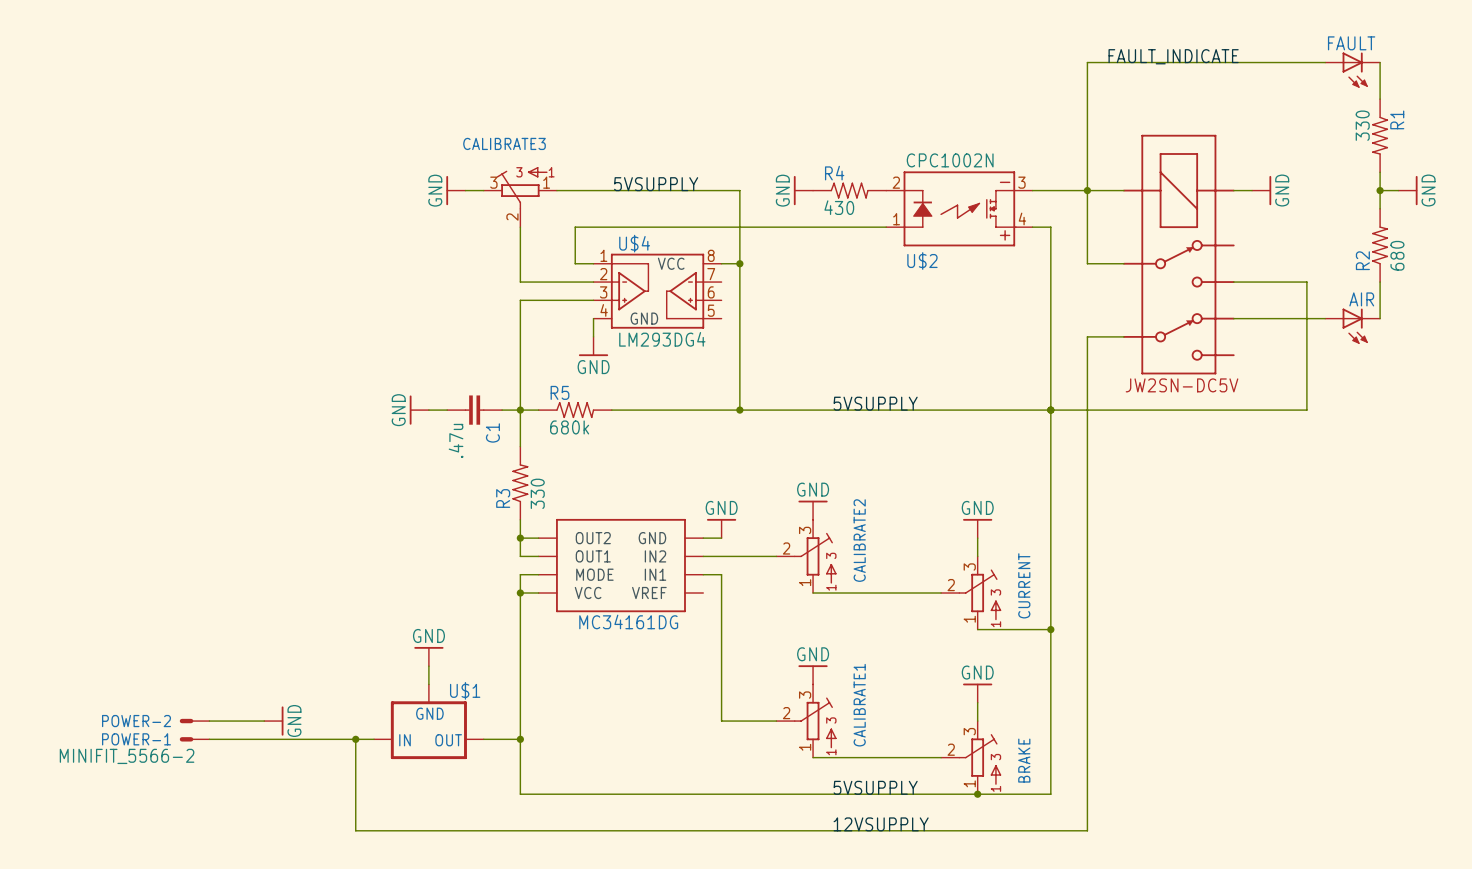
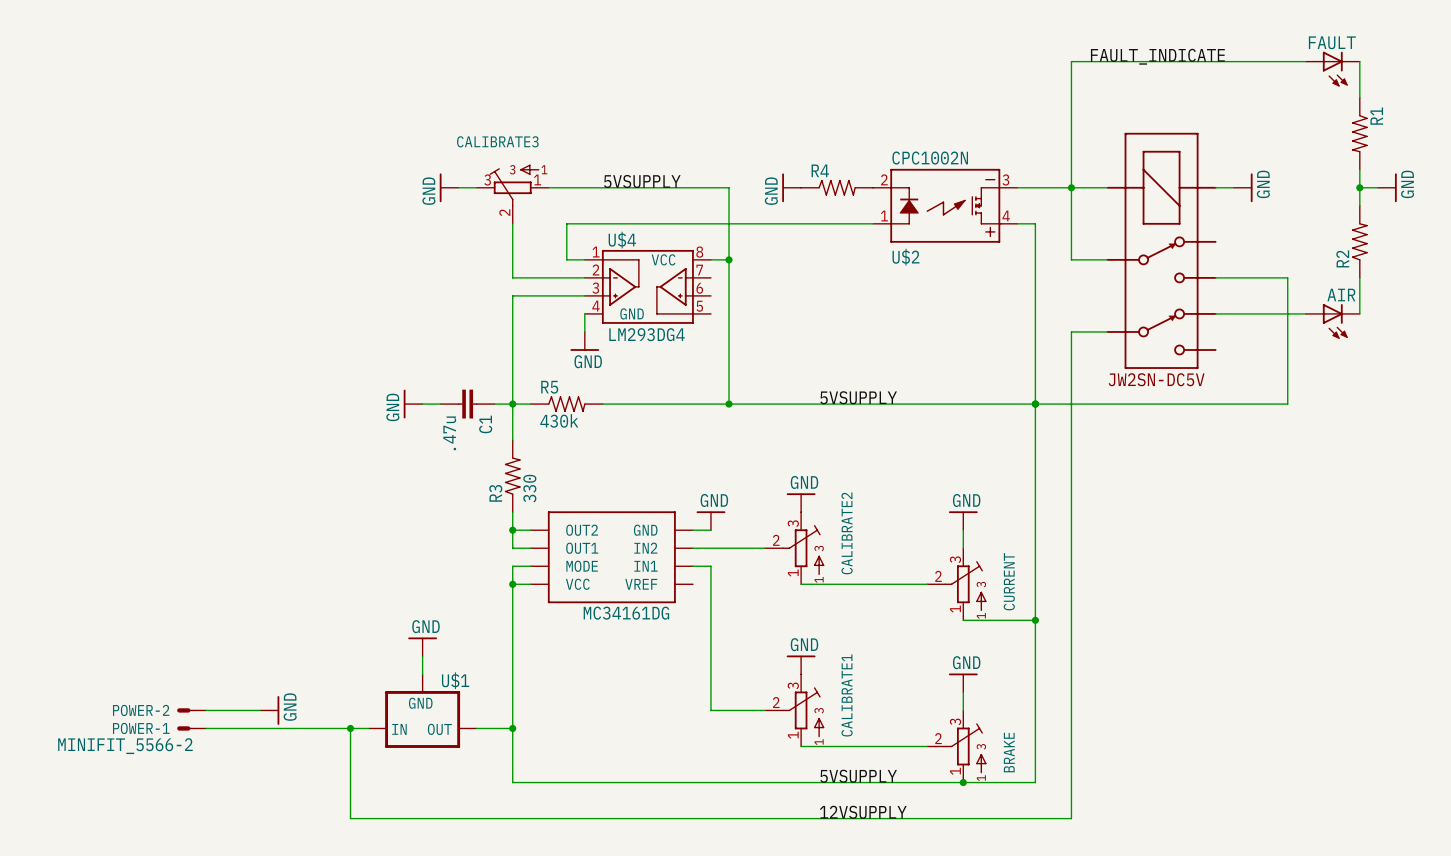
R1 value: 330 (1362, 125) -> none
R4 value: 430 (839, 207) -> none
R2 value: 680 (1397, 255) -> none
R5 value: 680k (569, 427) -> 430k (559, 420)

